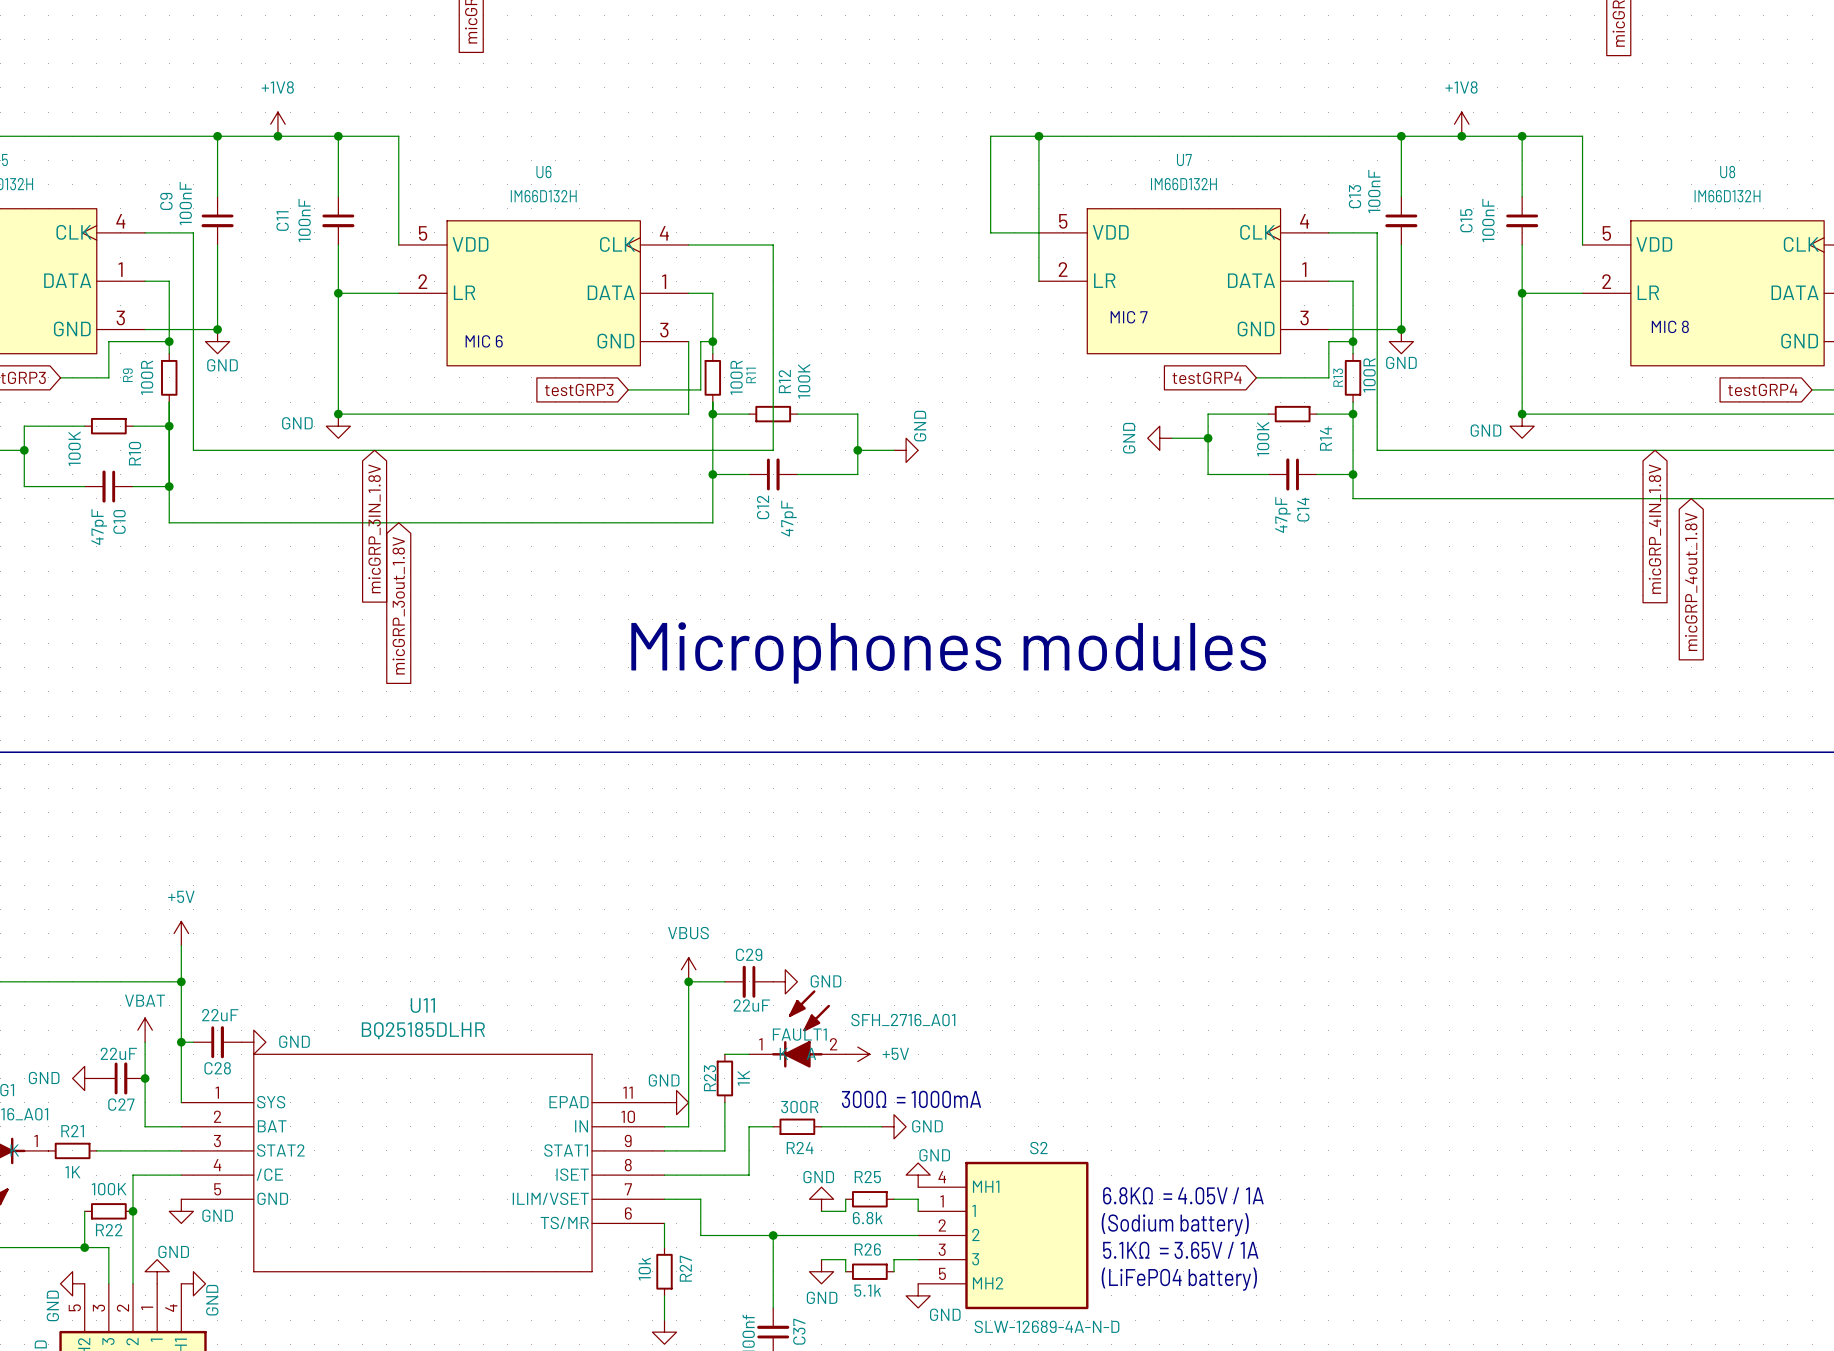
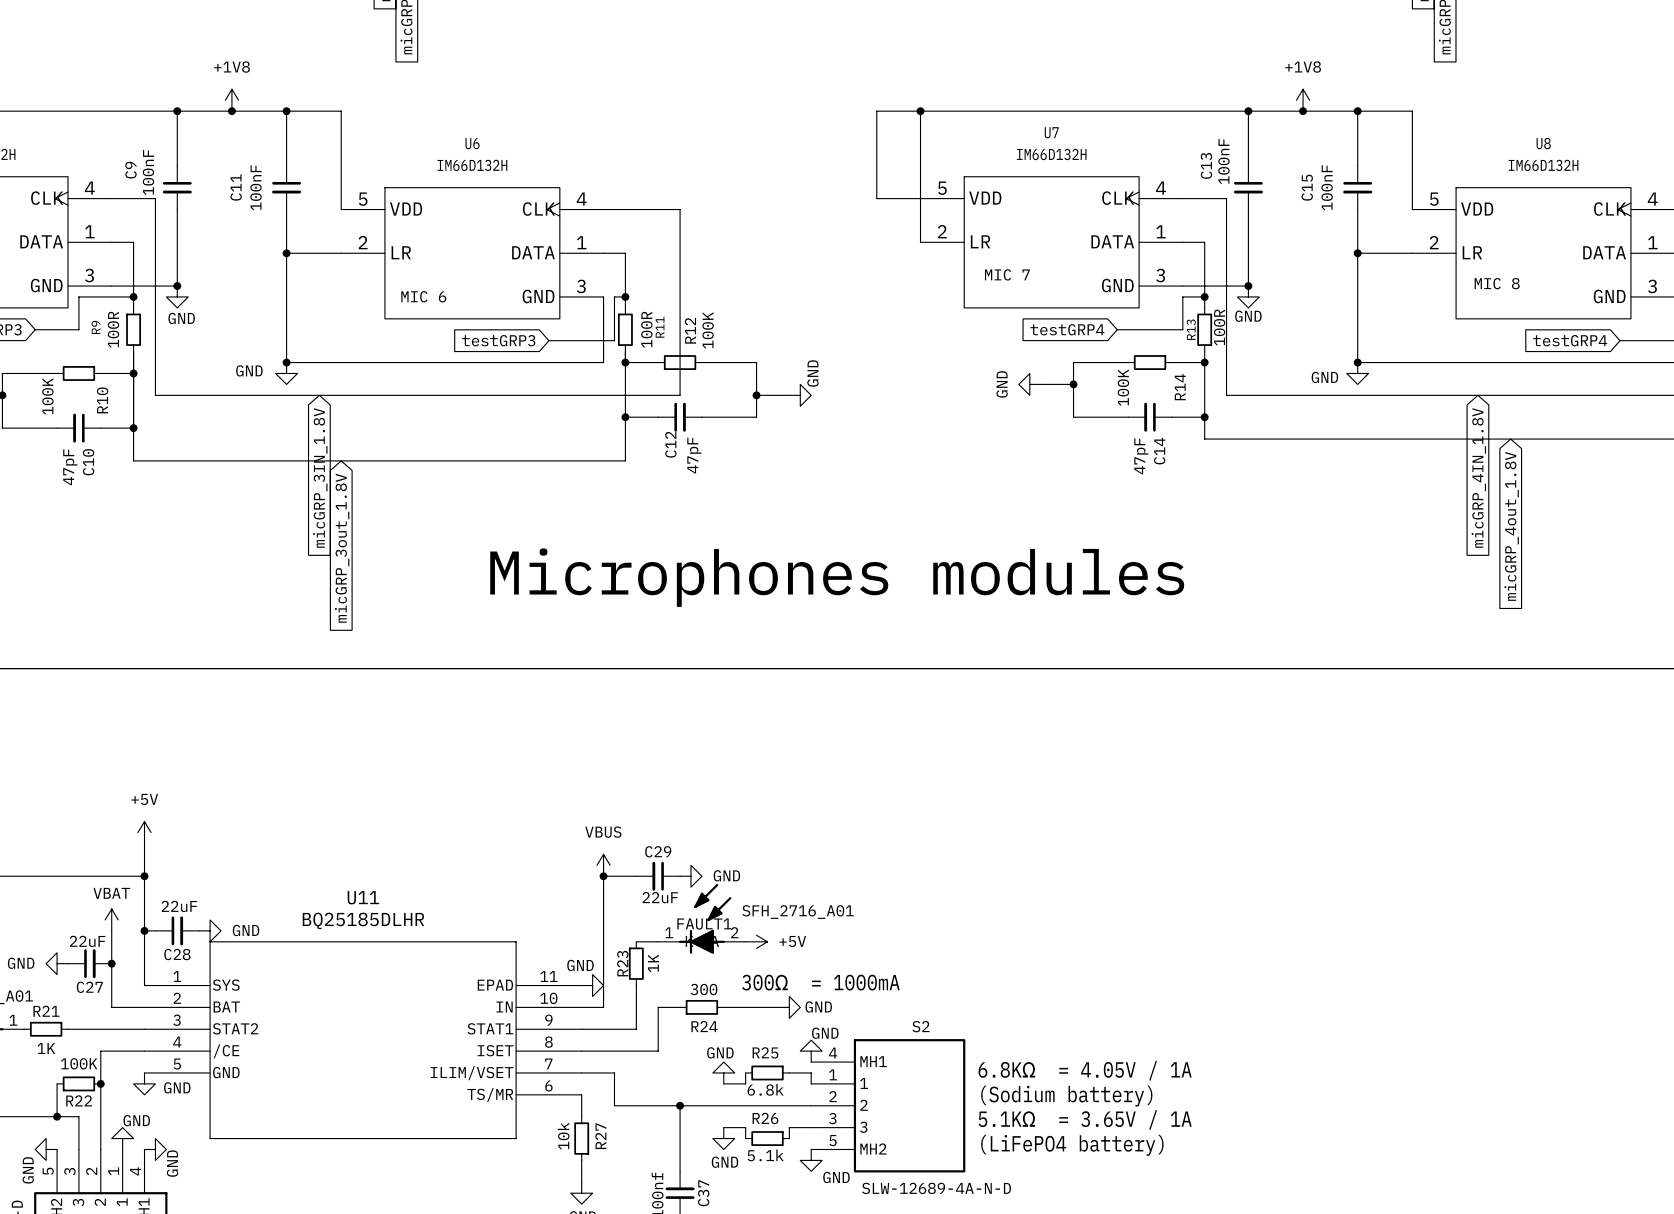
R24 value: 300R (799, 1107) -> 300 (704, 989)

